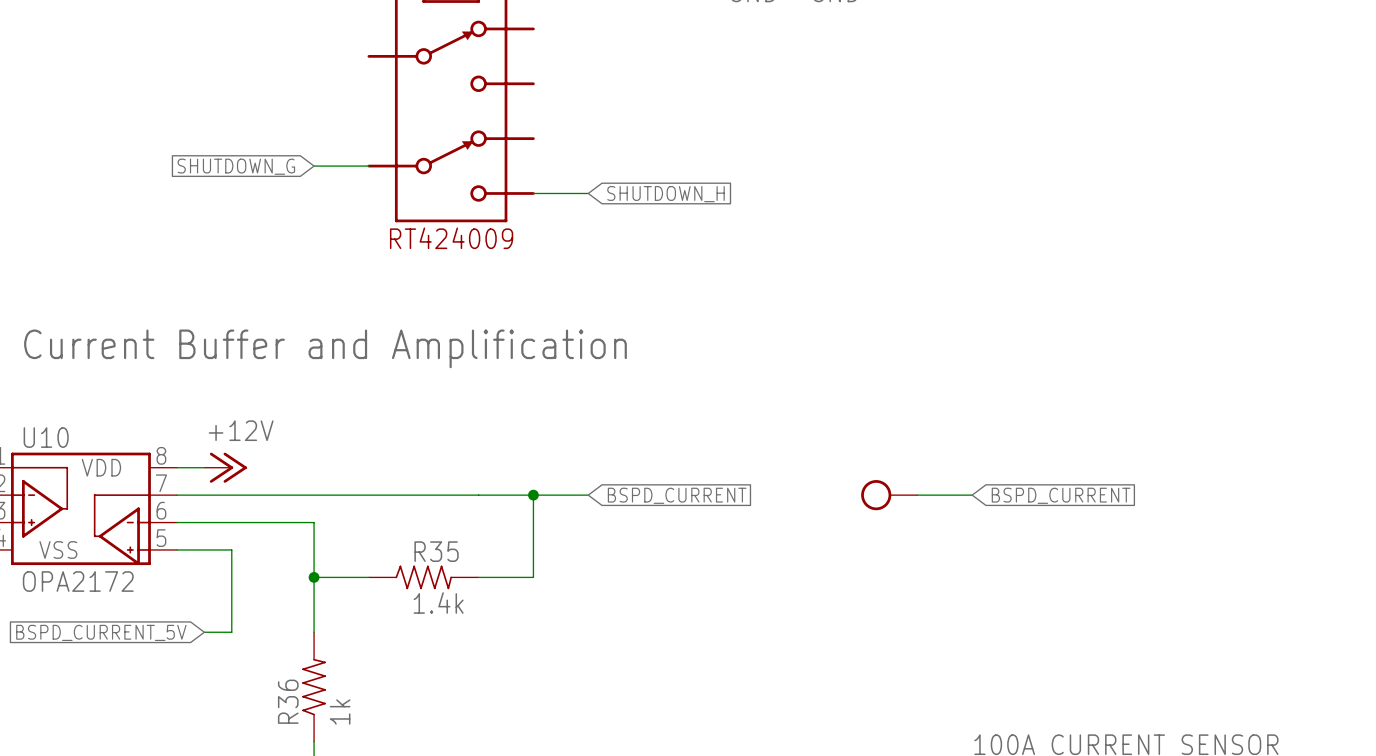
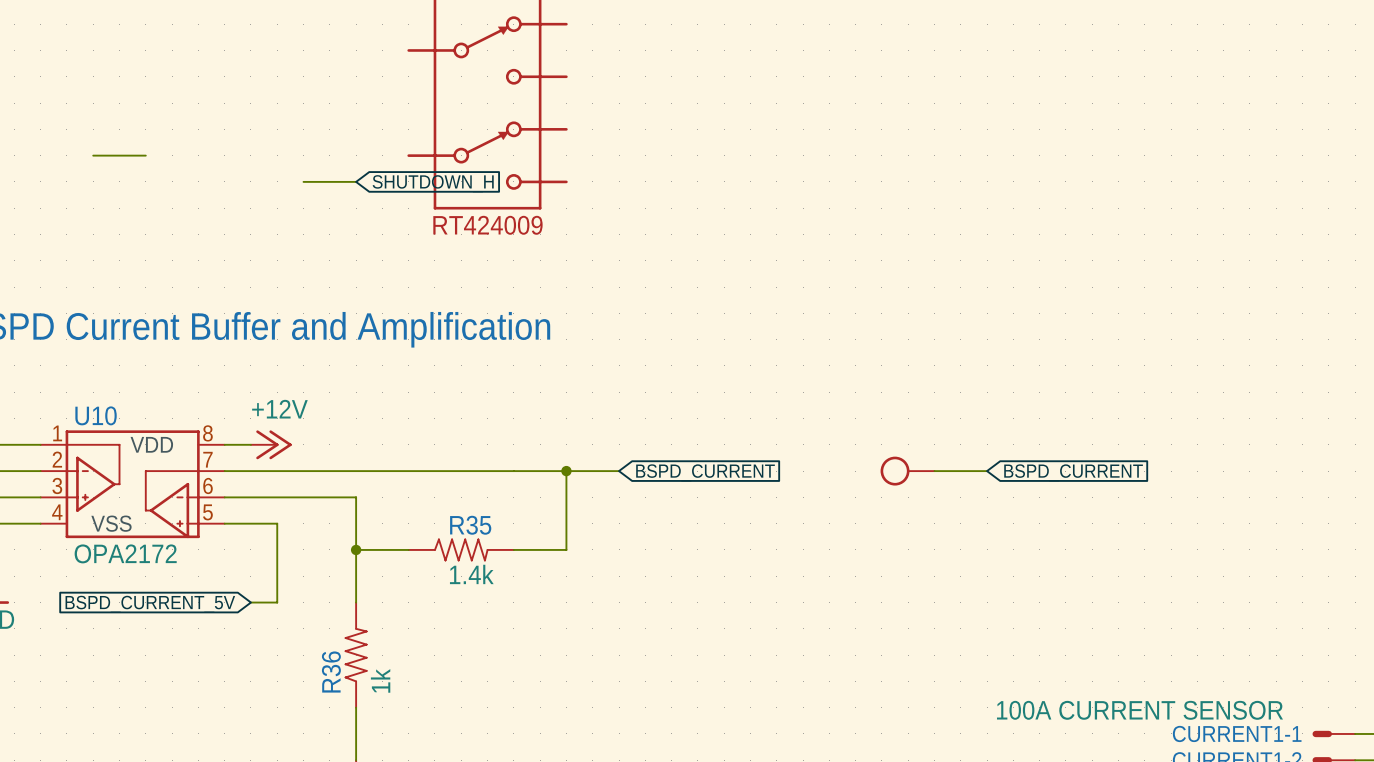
wire: none -> (93, 155) (145, 155)
global label: SHUTDOWN_G (236, 166) -> SHUTDOWN_H (433, 183)
wire: (314, 166) (368, 166) -> (303, 181) (356, 181)
wire: (533, 193) (588, 193) -> none
global label: SHUTDOWN_H (665, 194) -> none

